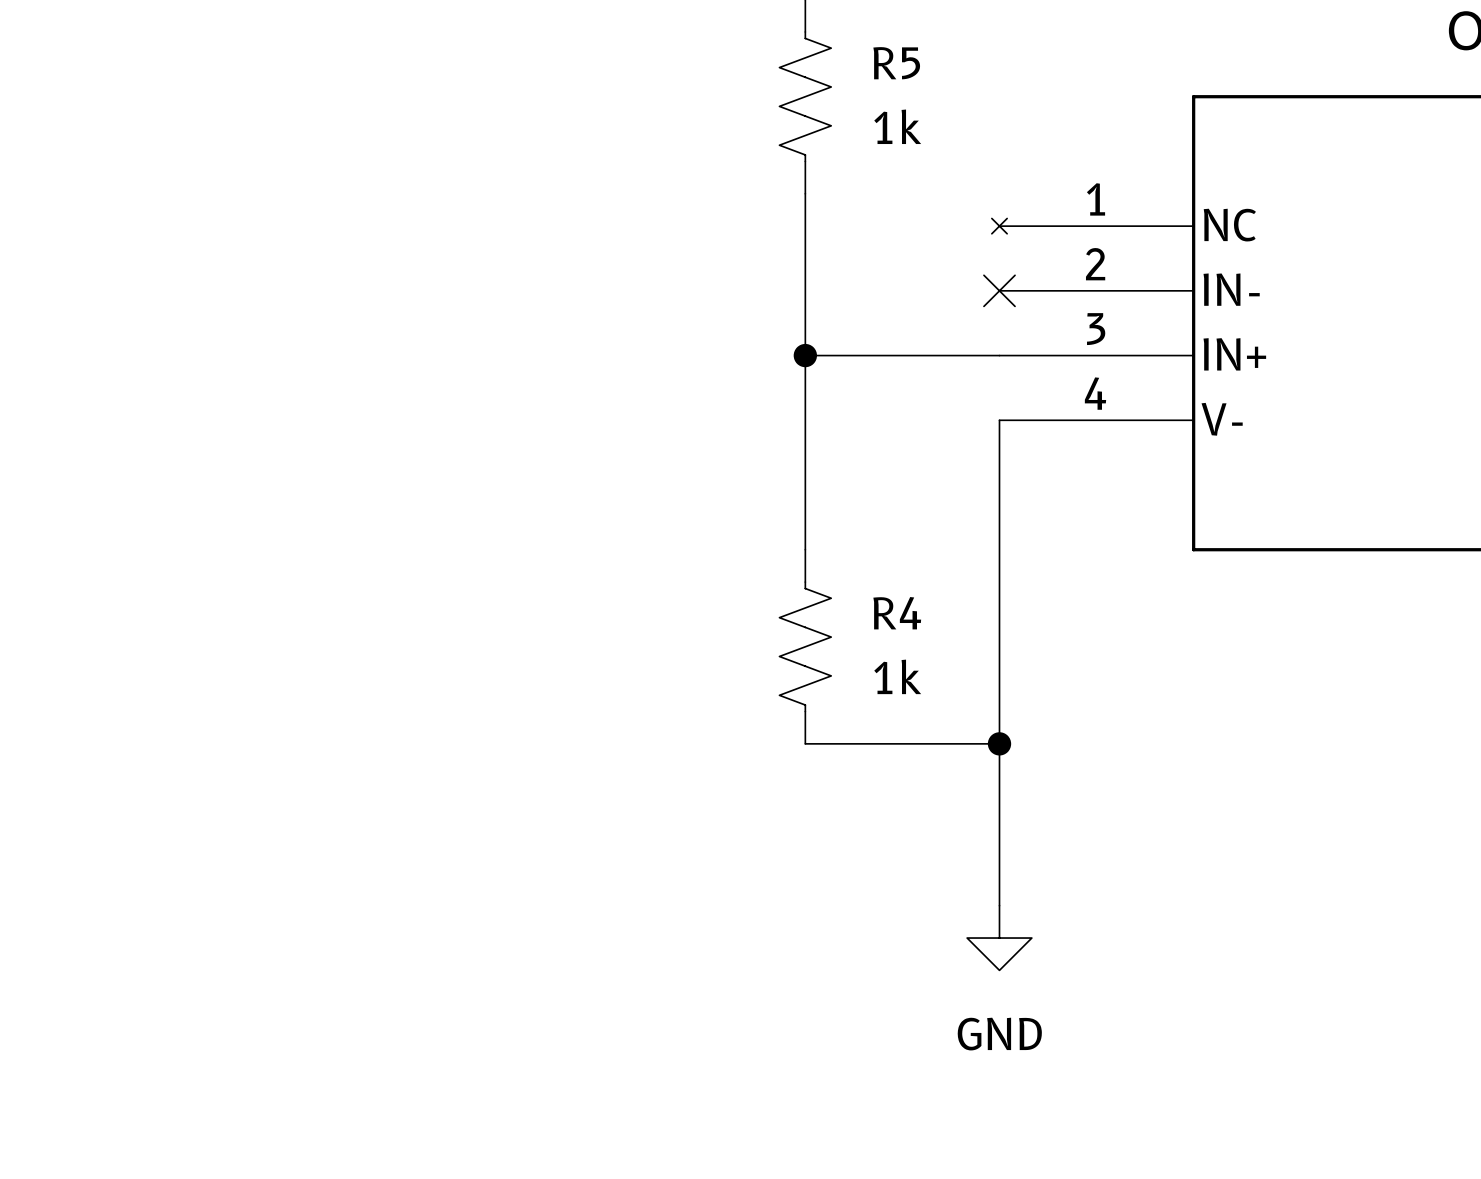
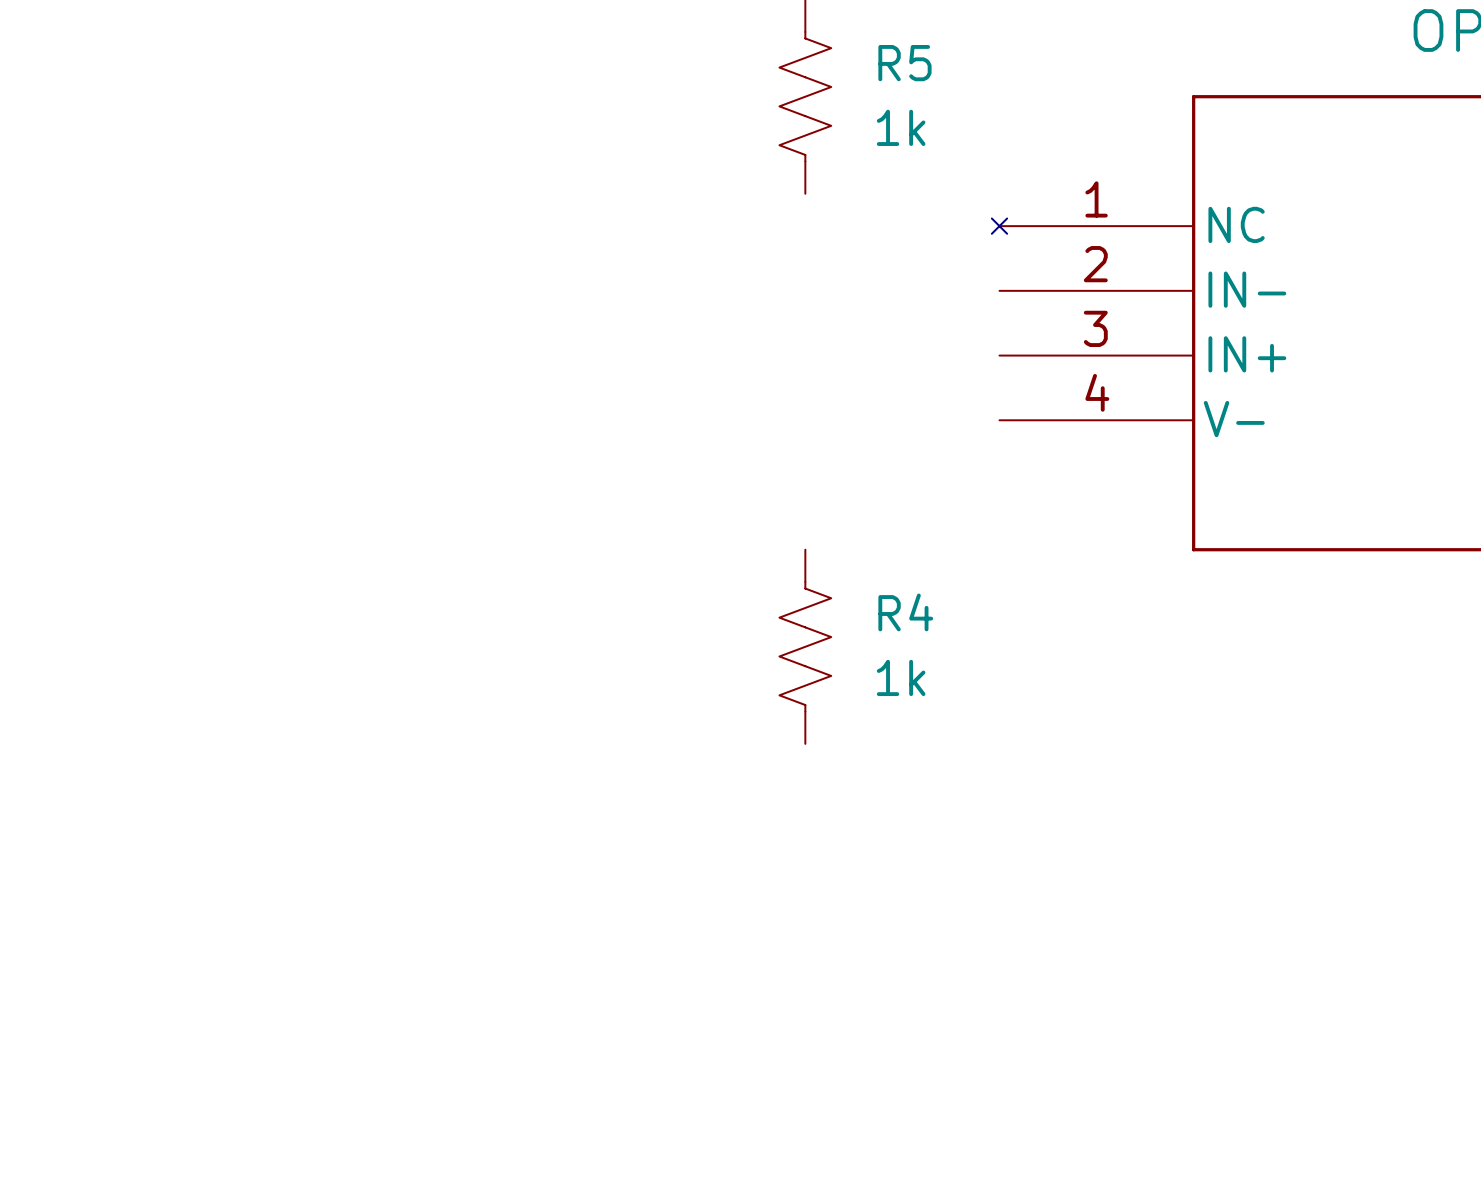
wire: (805, 193) (805, 549) -> none
no-connect mark: (999, 290) -> none
wire: (805, 355) (999, 355) -> none
junction: (805, 355) -> none
wire: (999, 420) (999, 905) -> none
wire: (805, 743) (999, 743) -> none
junction: (999, 743) -> none
power symbol: GND (999, 938) -> none

